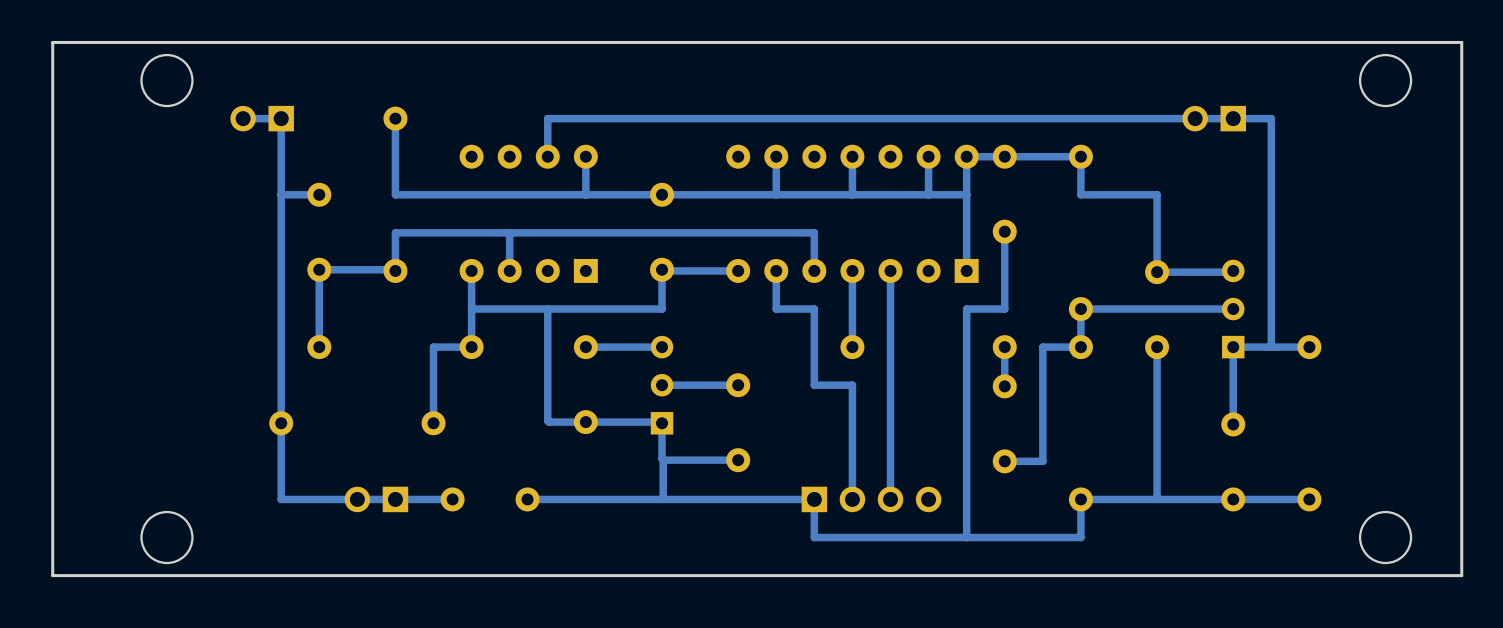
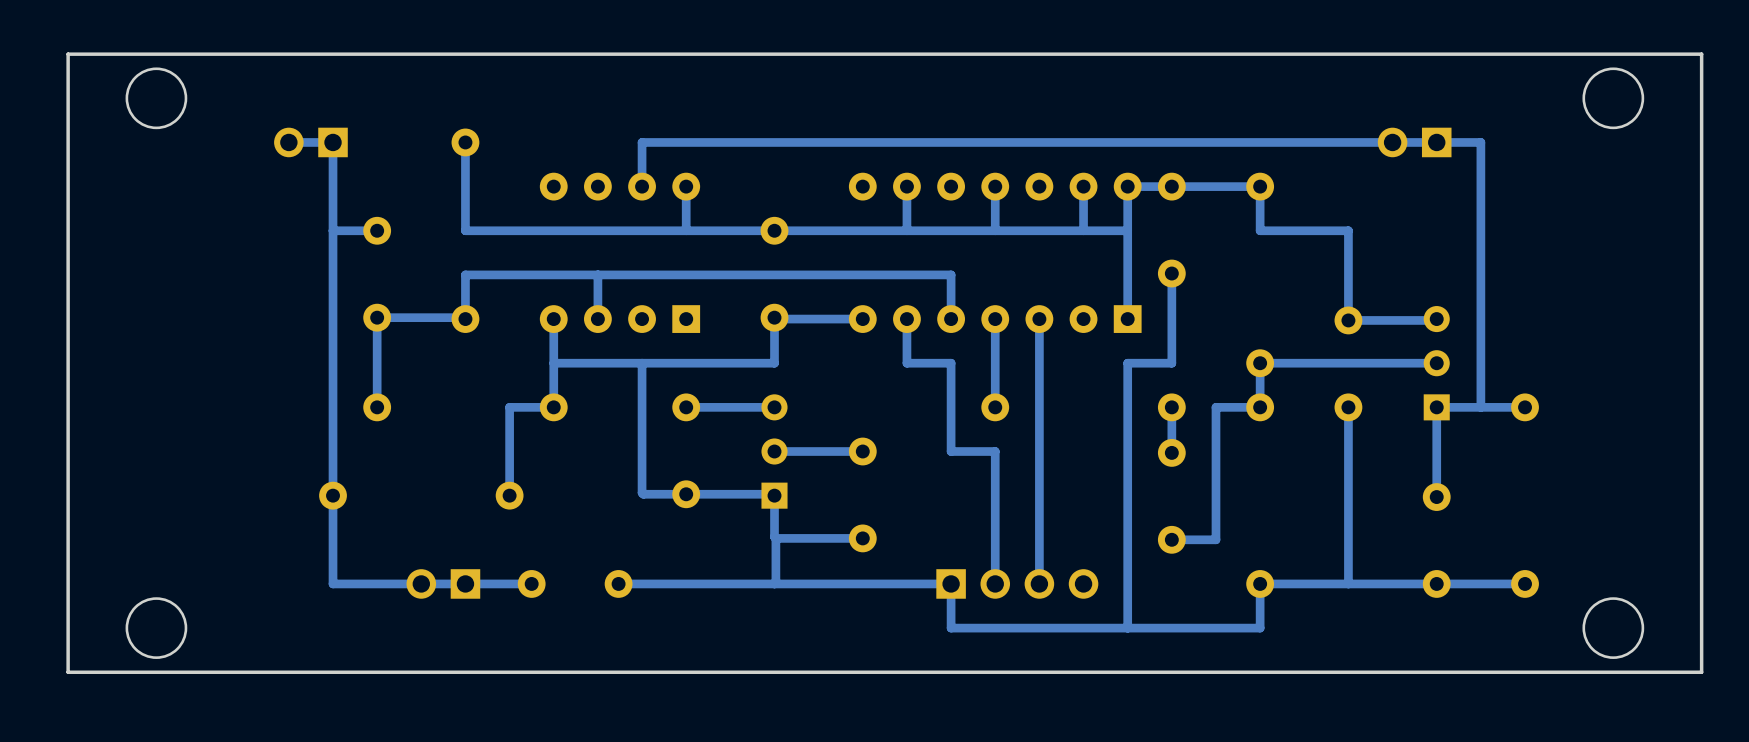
round board edge position: (166, 80) -> (156, 98)
round board edge position: (166, 537) -> (156, 628)

